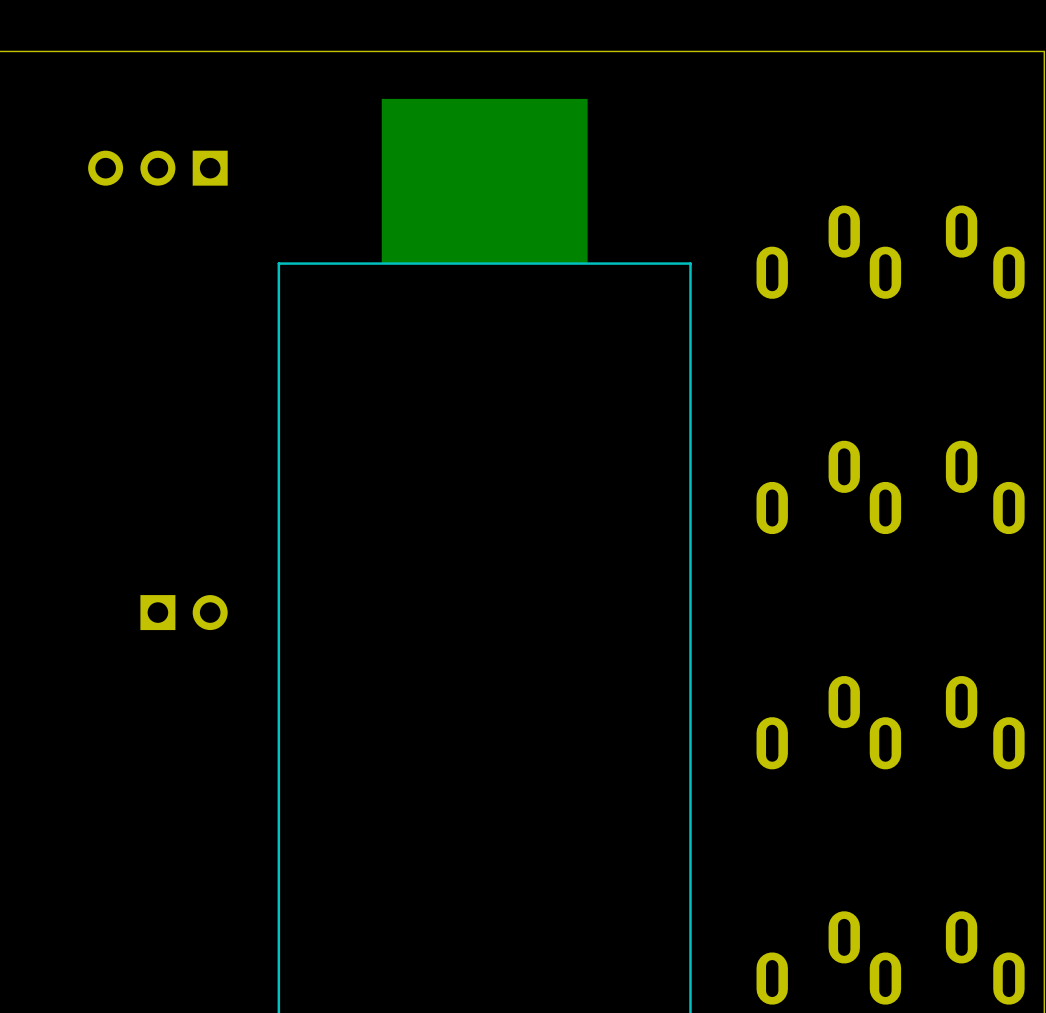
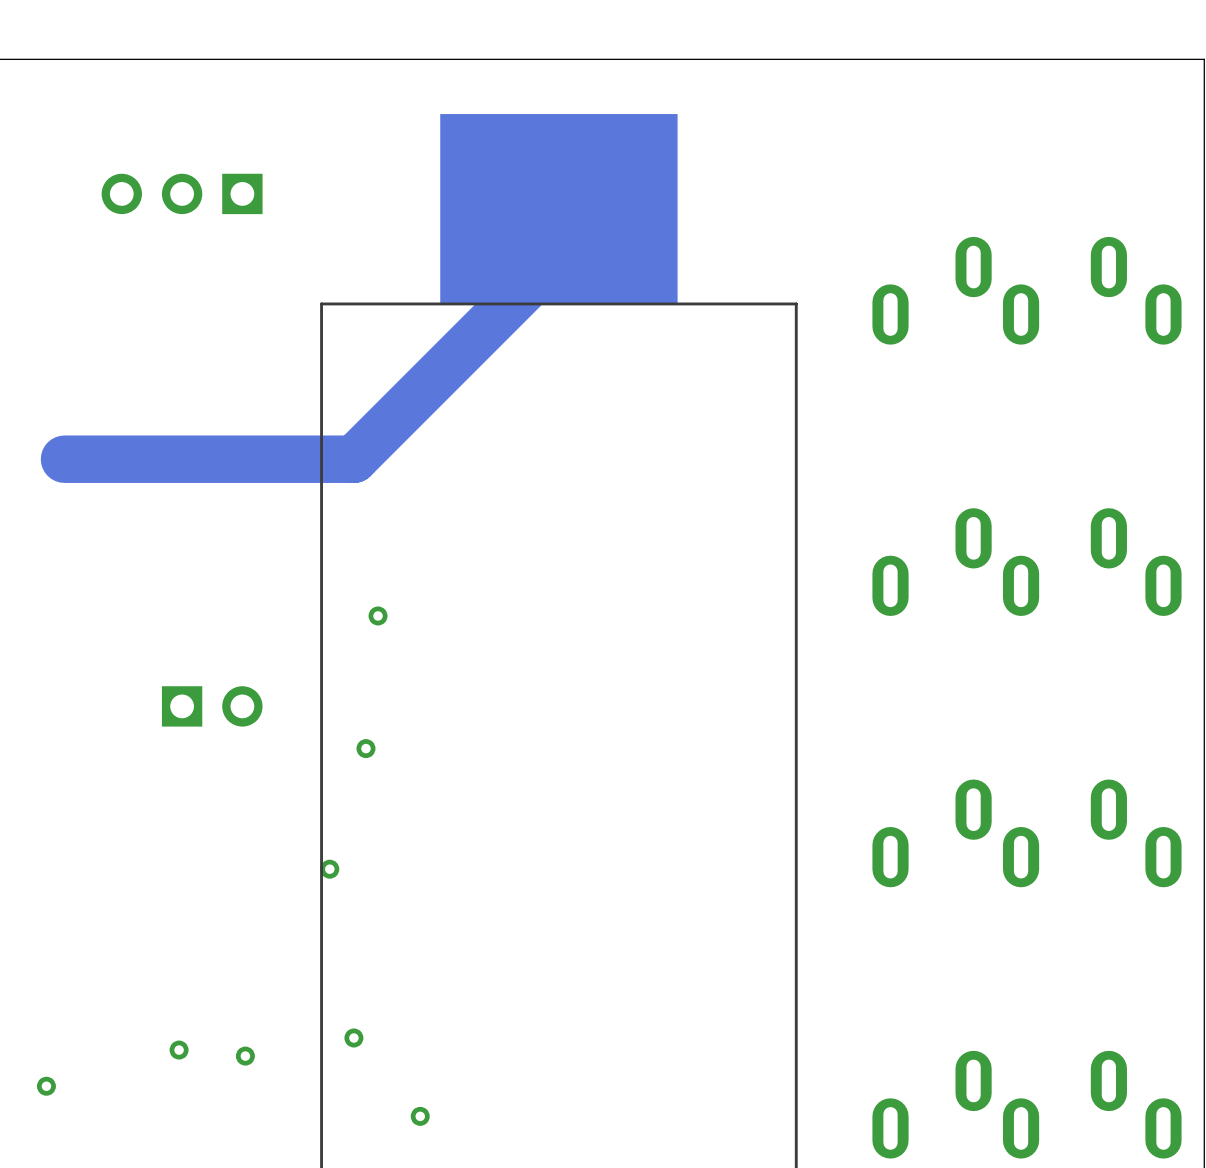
track: none -> (558, 209) (558, 254) (353, 459) (64, 459)
via: none -> (378, 615)
via: none -> (365, 748)
via: none -> (329, 869)
via: none -> (353, 1038)
via: none -> (179, 1050)
via: none -> (245, 1056)
via: none -> (46, 1086)
via: none -> (420, 1116)

